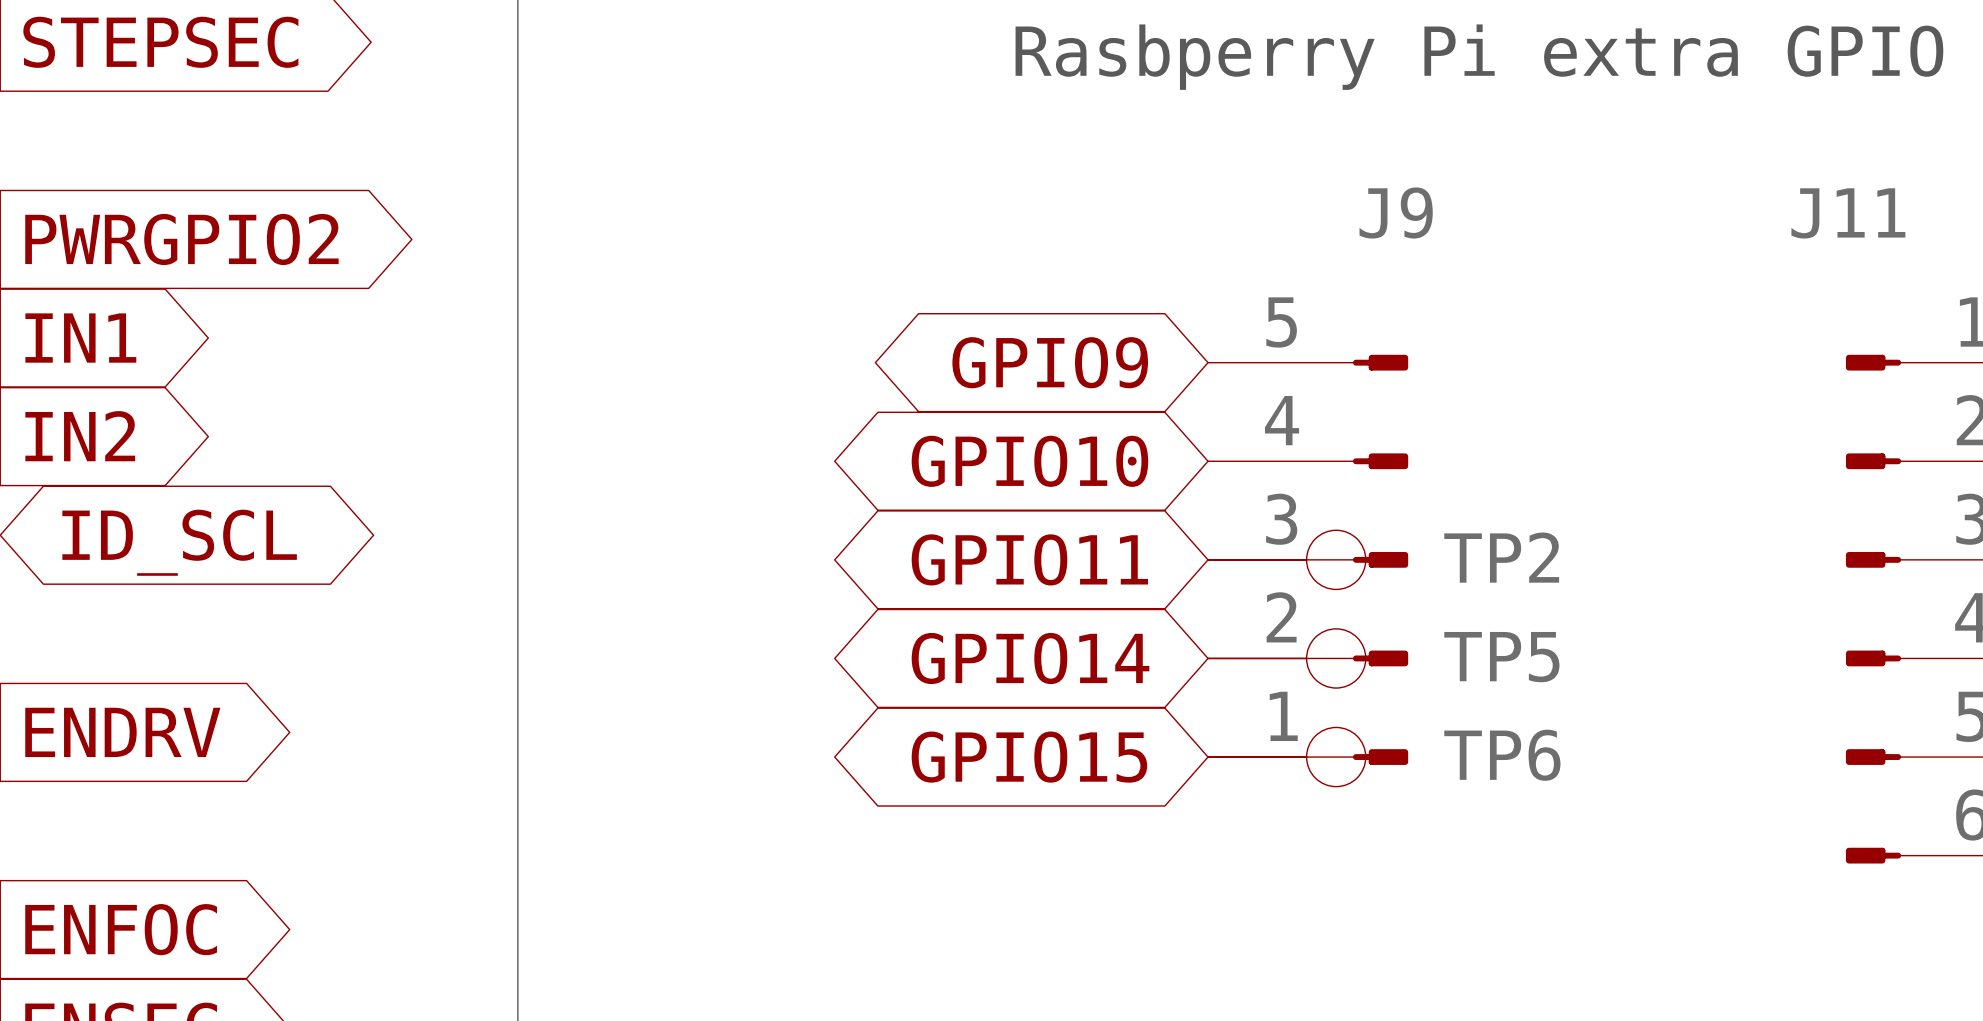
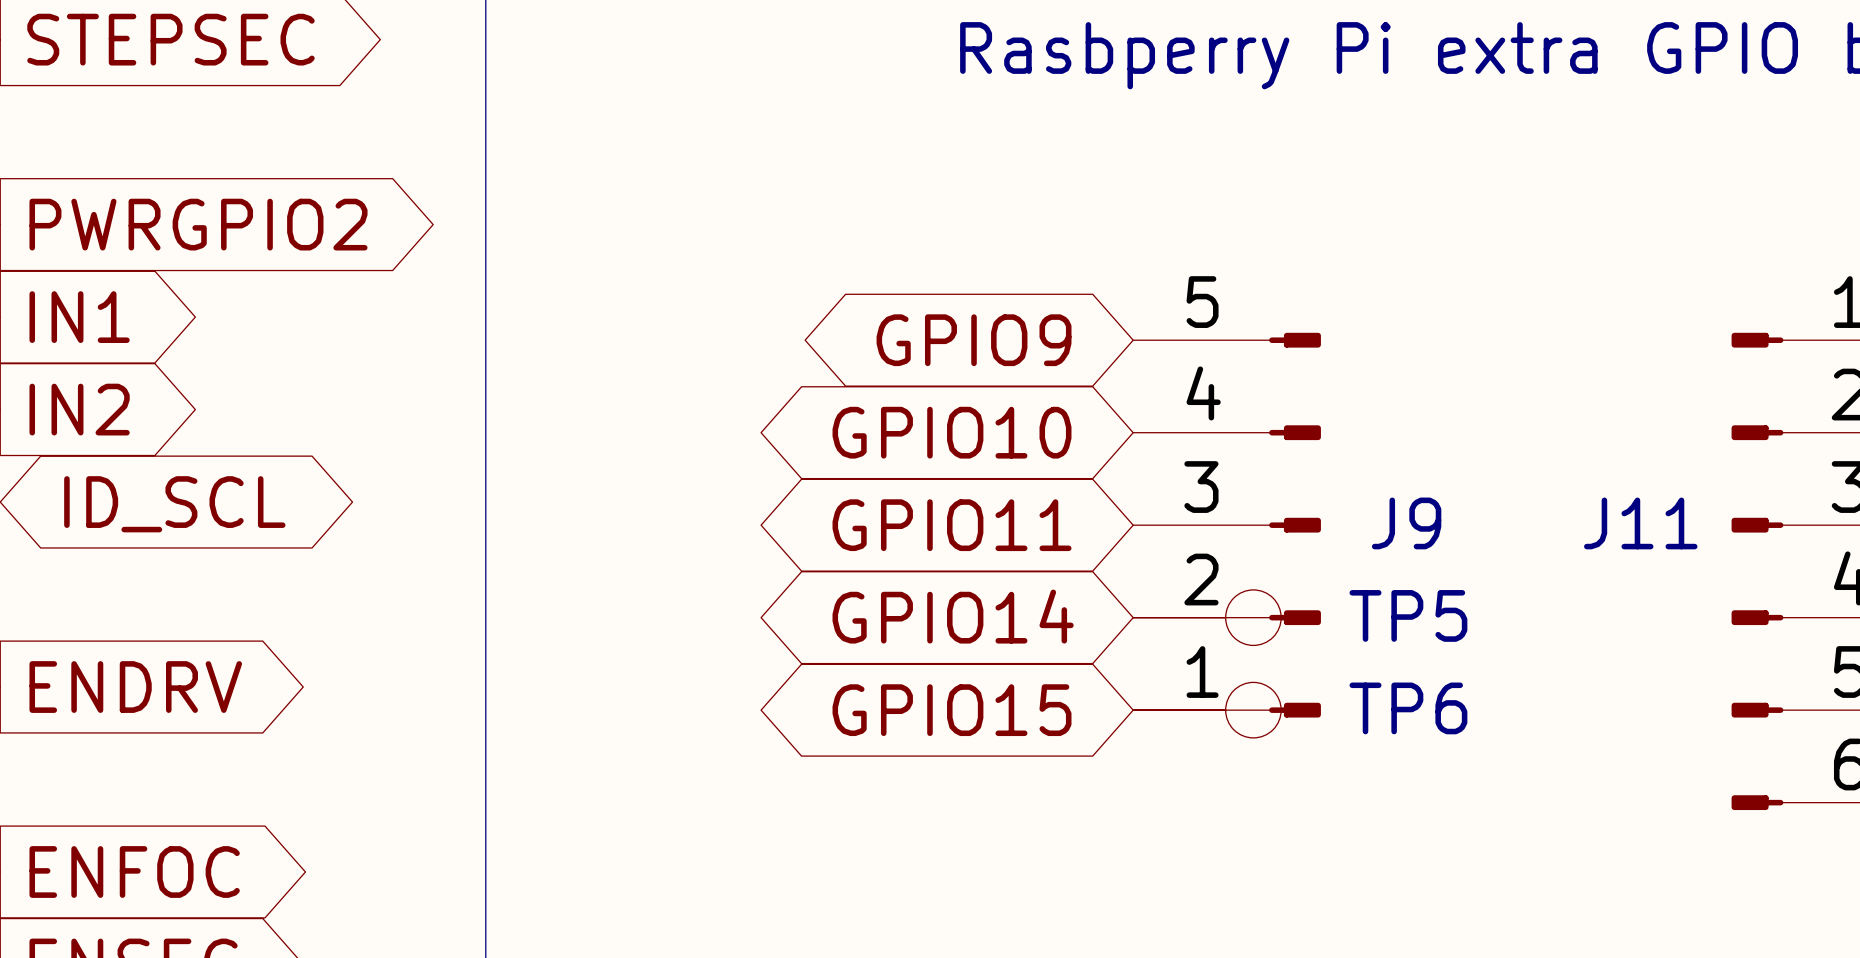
J9 name position: J9 (1396, 212) -> J9 (1406, 523)
J11 name position: J11 (1848, 213) -> J11 (1640, 523)
TP2: (1286, 559) -> none

